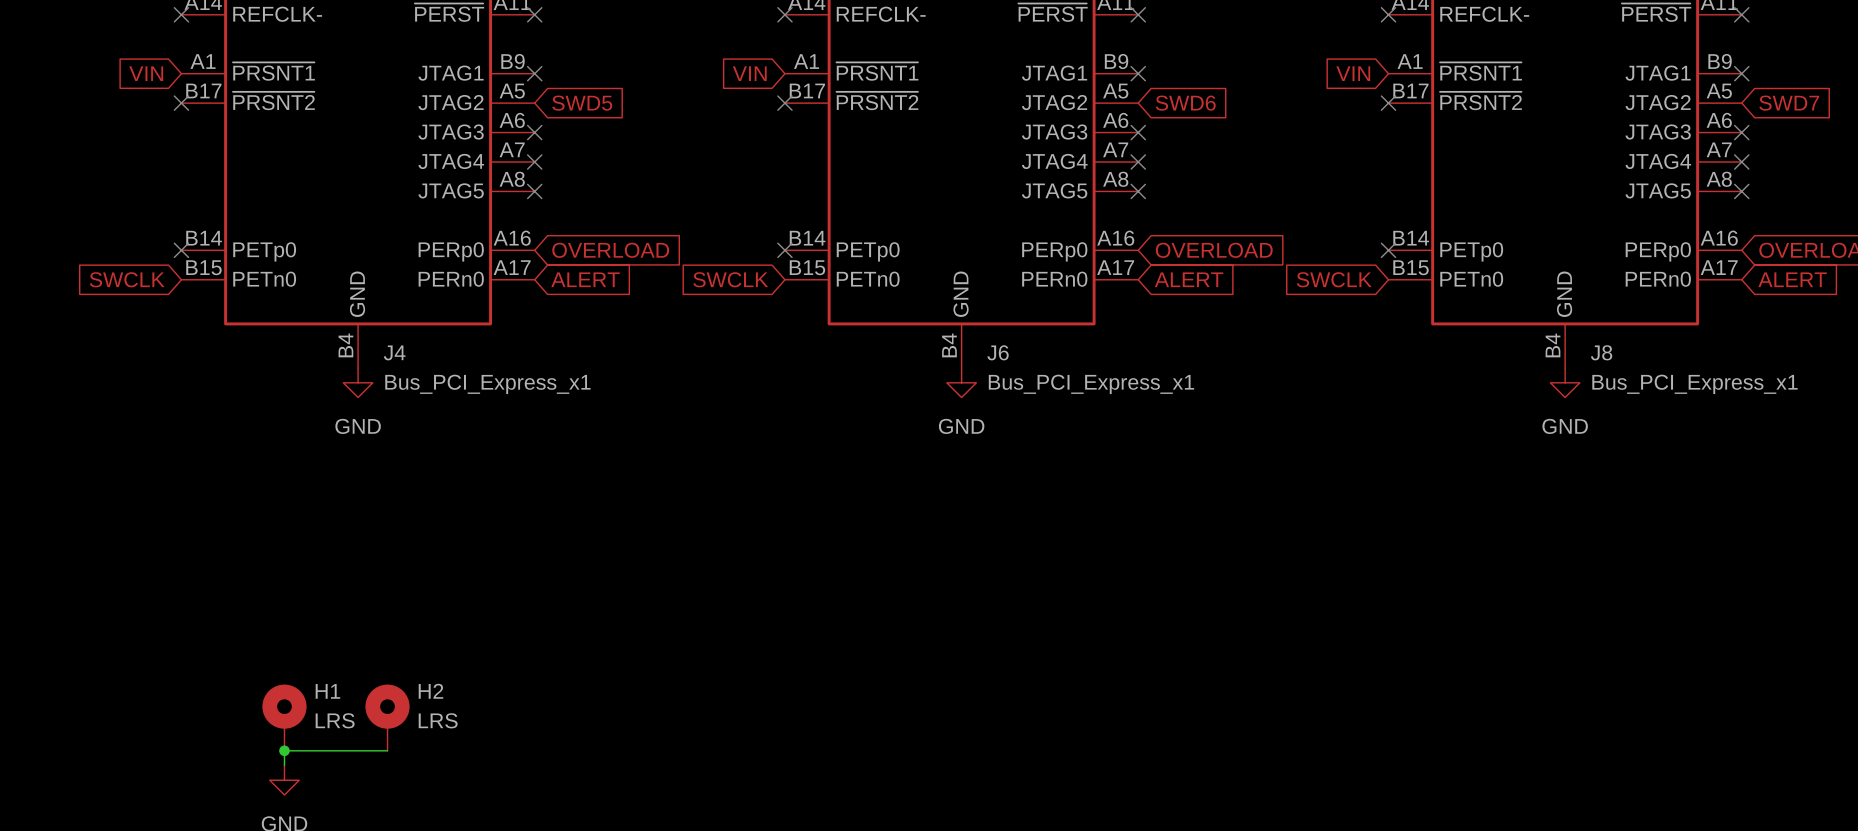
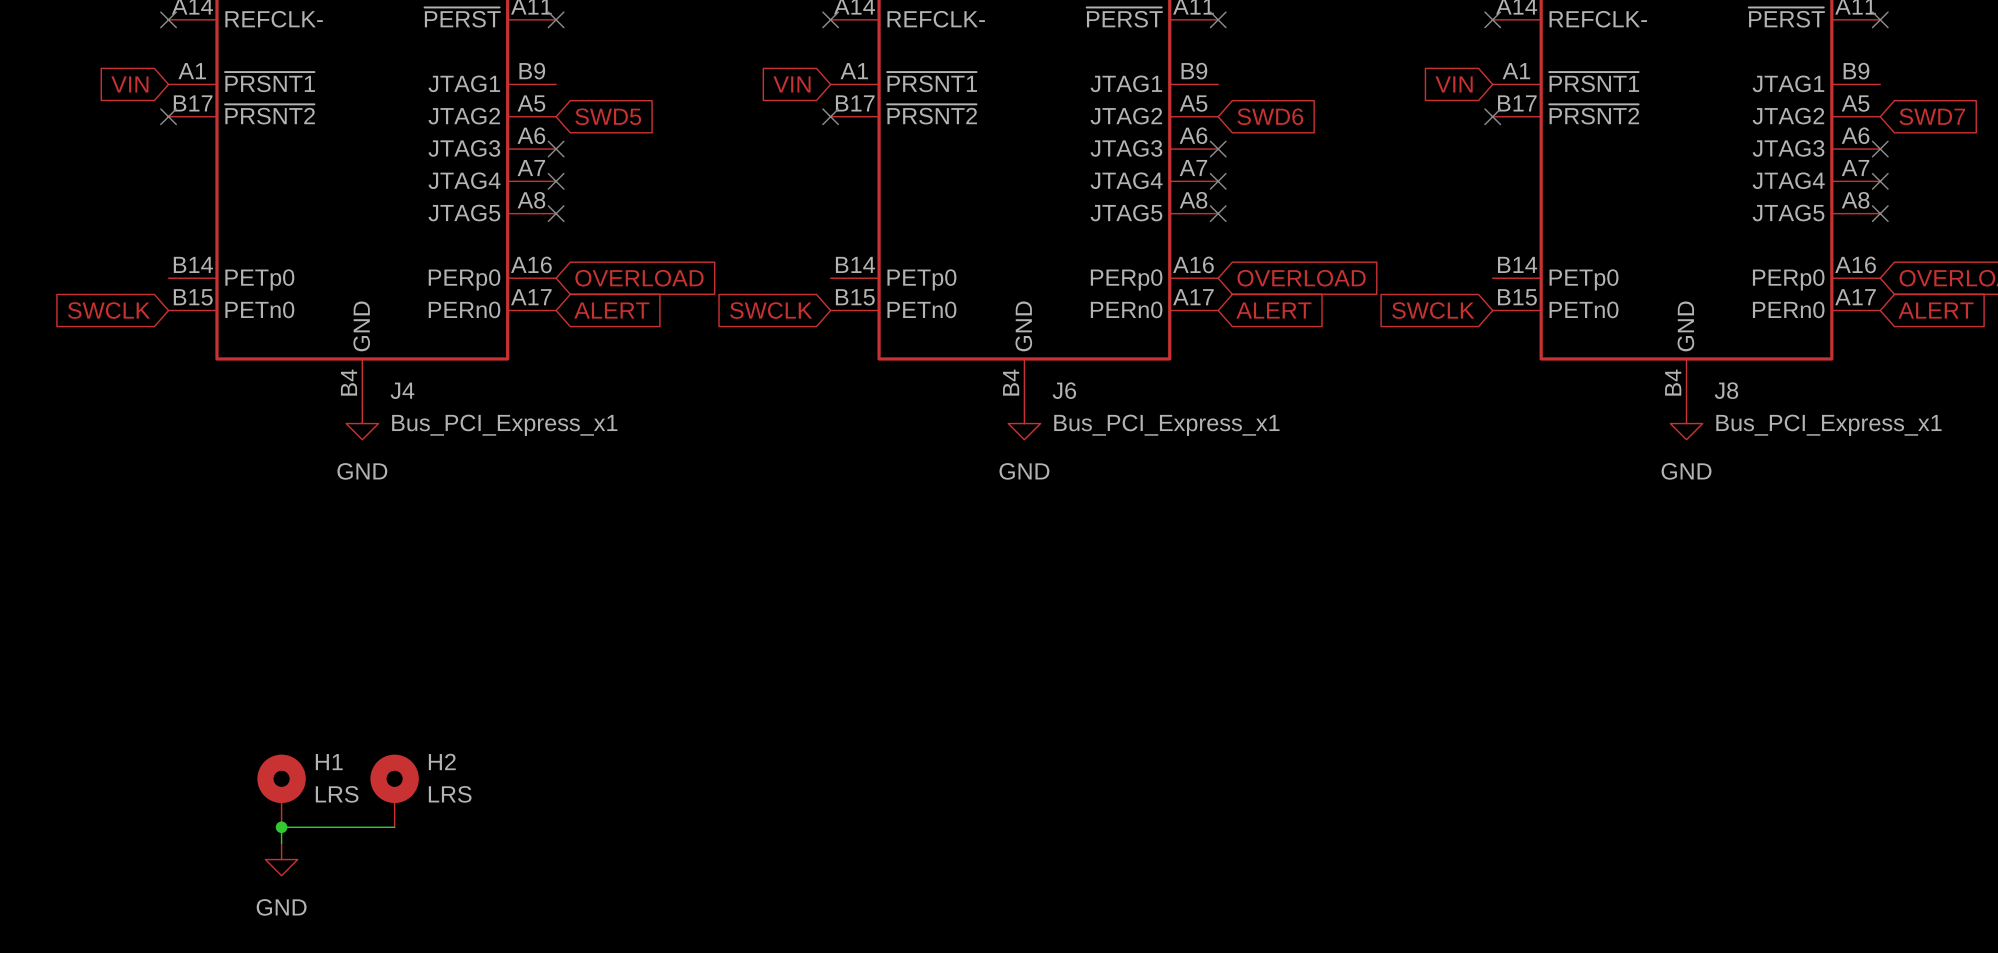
no-connect mark: (534, 73) -> none
no-connect mark: (1138, 73) -> none
no-connect mark: (1741, 73) -> none
no-connect mark: (181, 250) -> none
no-connect mark: (784, 250) -> none
no-connect mark: (1388, 250) -> none

